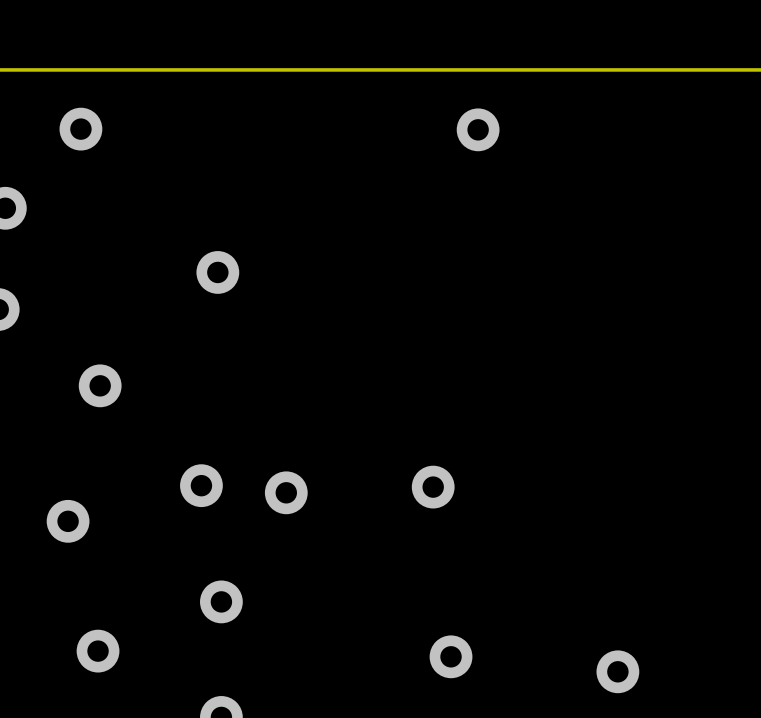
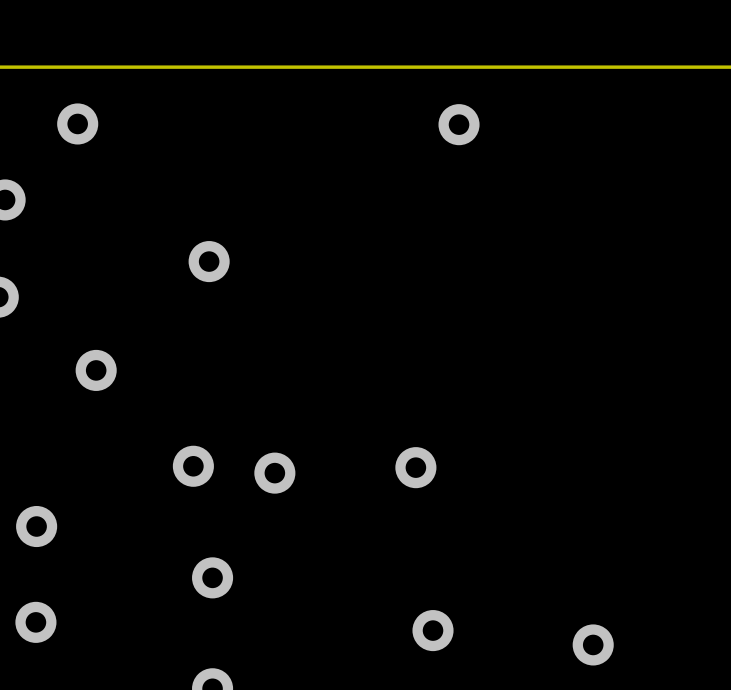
via position: (68, 521) -> (36, 526)
via: none -> (35, 622)
via: (98, 651) -> none

